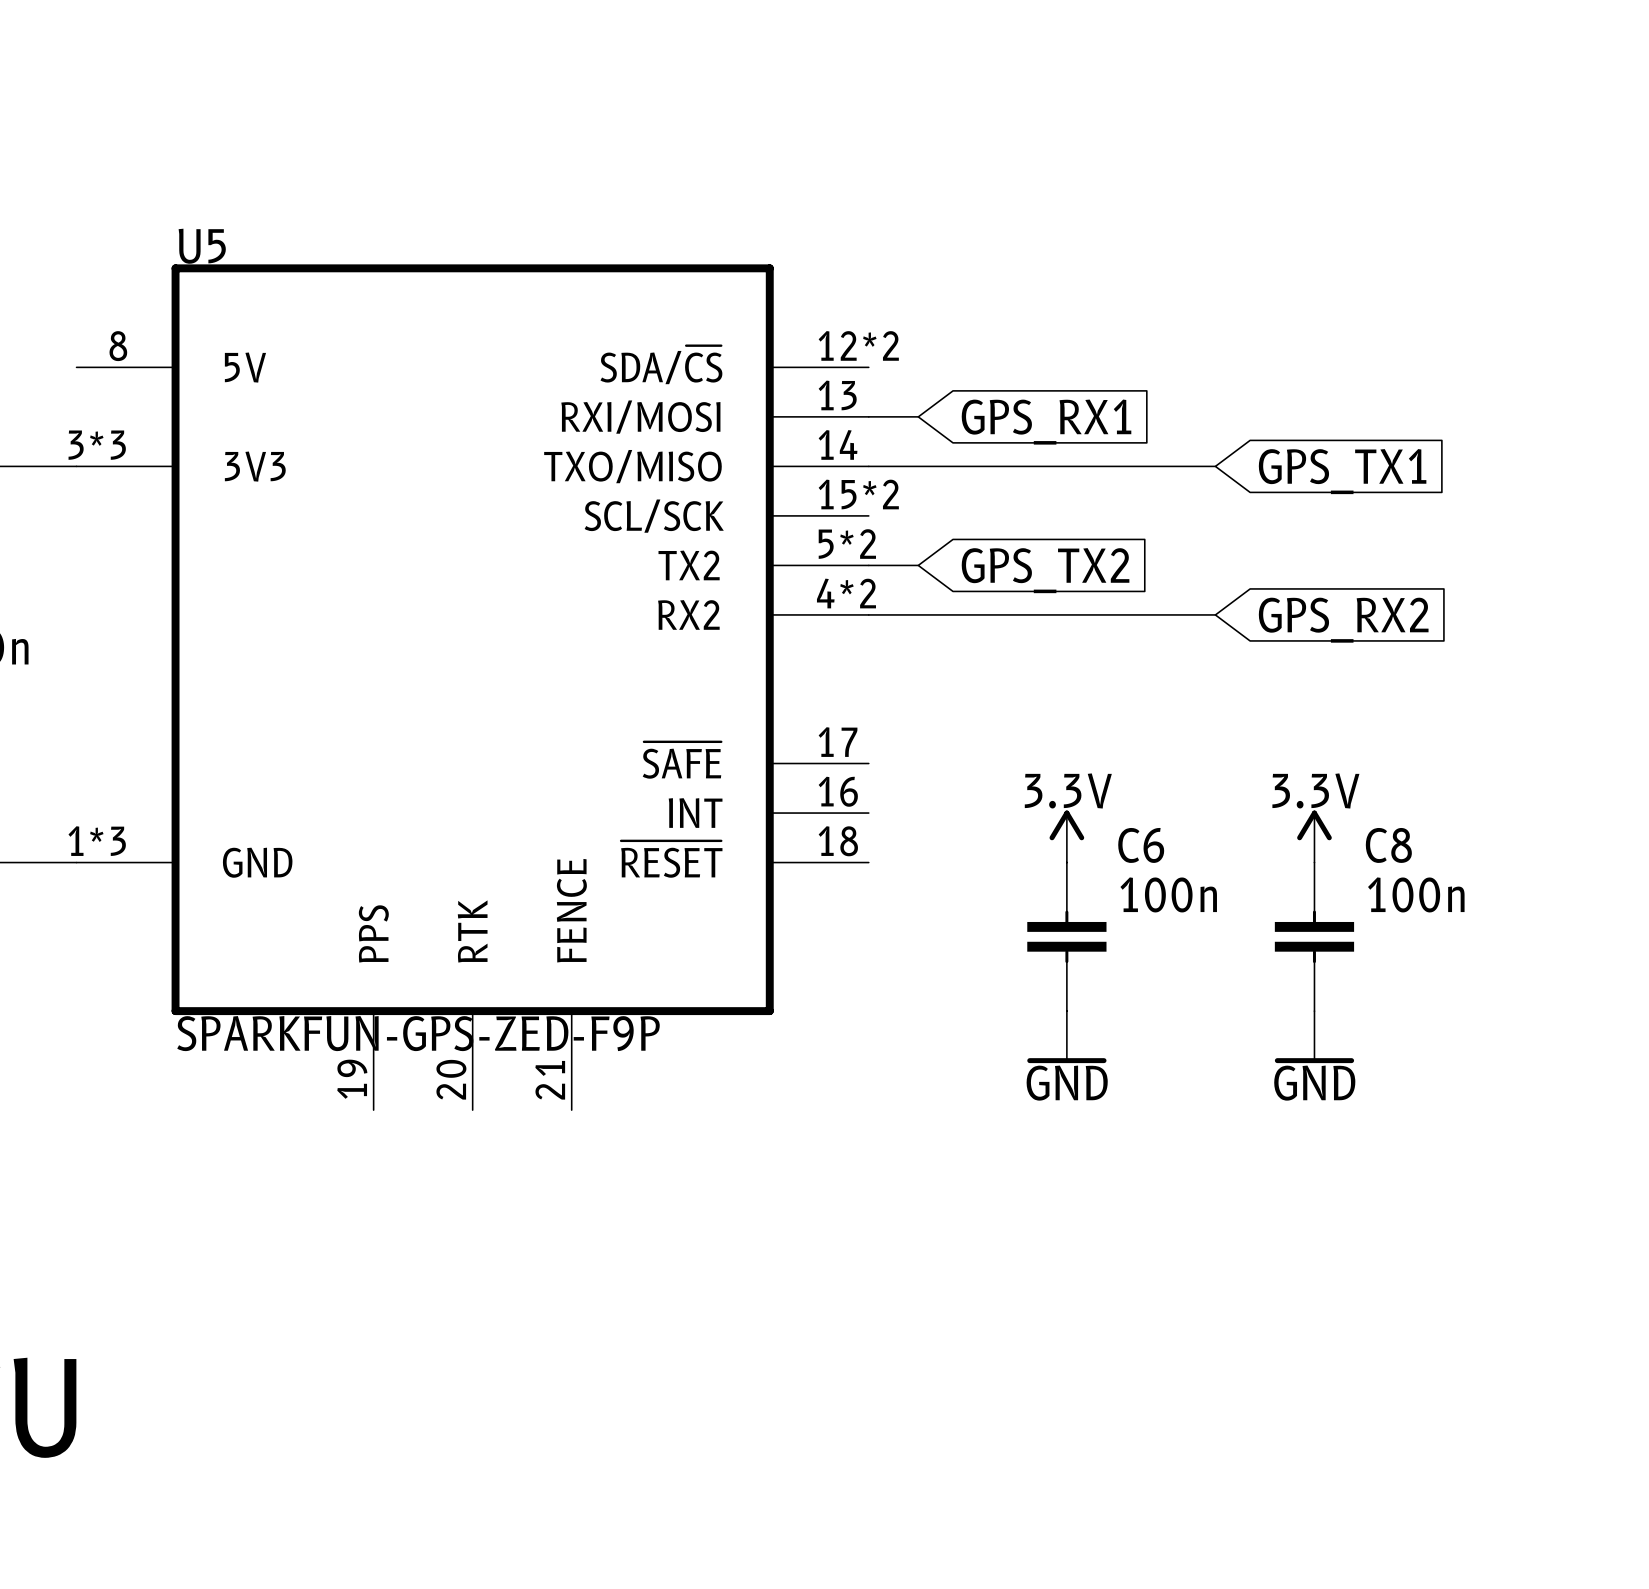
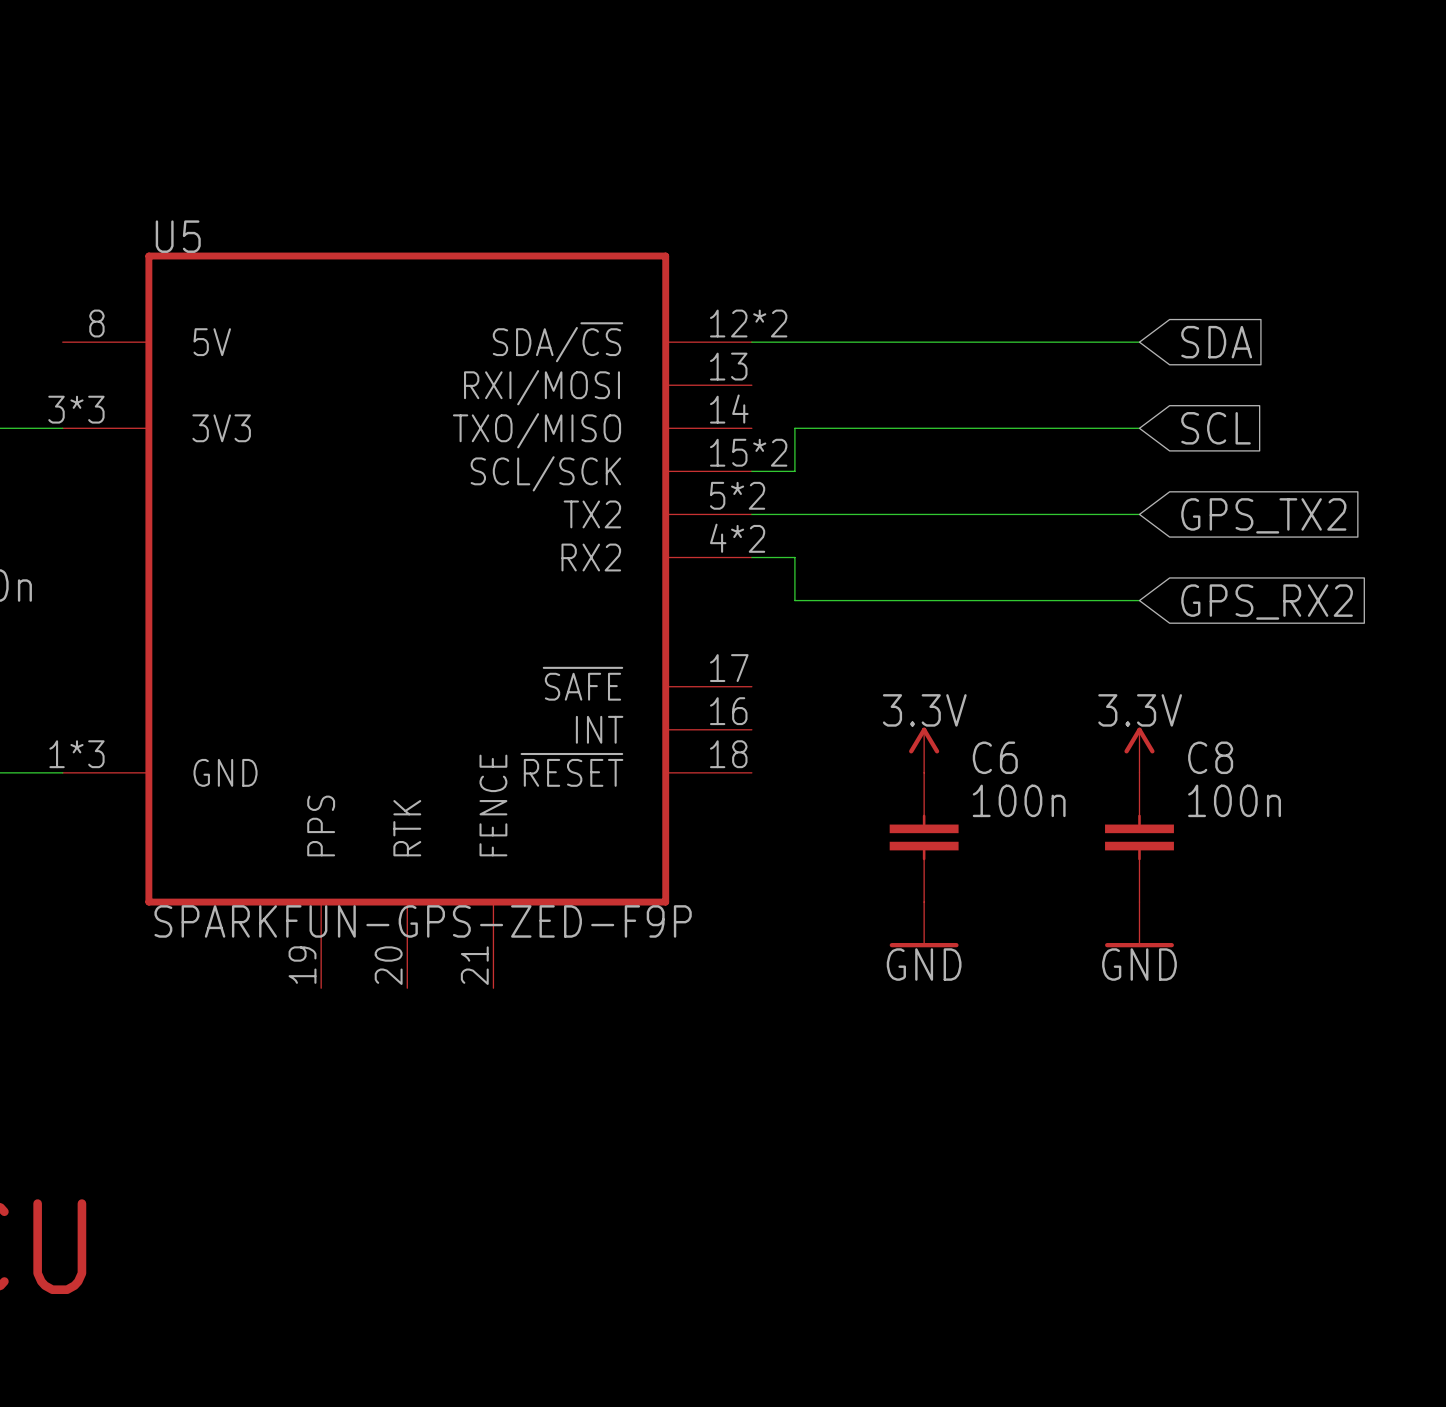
wire: none -> (751, 342) (1139, 342)
global label: none -> SDA (1216, 342)
wire: (868, 416) (918, 416) -> none
global label: GPS_RX1 (1046, 422) -> none
wire: (868, 466) (918, 466) -> (751, 471) (794, 471) (794, 428)
wire: none -> (1053, 428) (1139, 428)
global label: none -> SCL (1216, 428)
global label: GPS_TX1 (1342, 471) -> none
wire: none -> (794, 514) (1139, 514)
global label position: GPS_TX2 (1045, 570) -> GPS_TX2 (1263, 515)
wire: (918, 614) (1215, 614) -> (794, 557) (794, 600) (1139, 600)
global label position: GPS_RX2 (1343, 620) -> GPS_RX2 (1267, 602)

